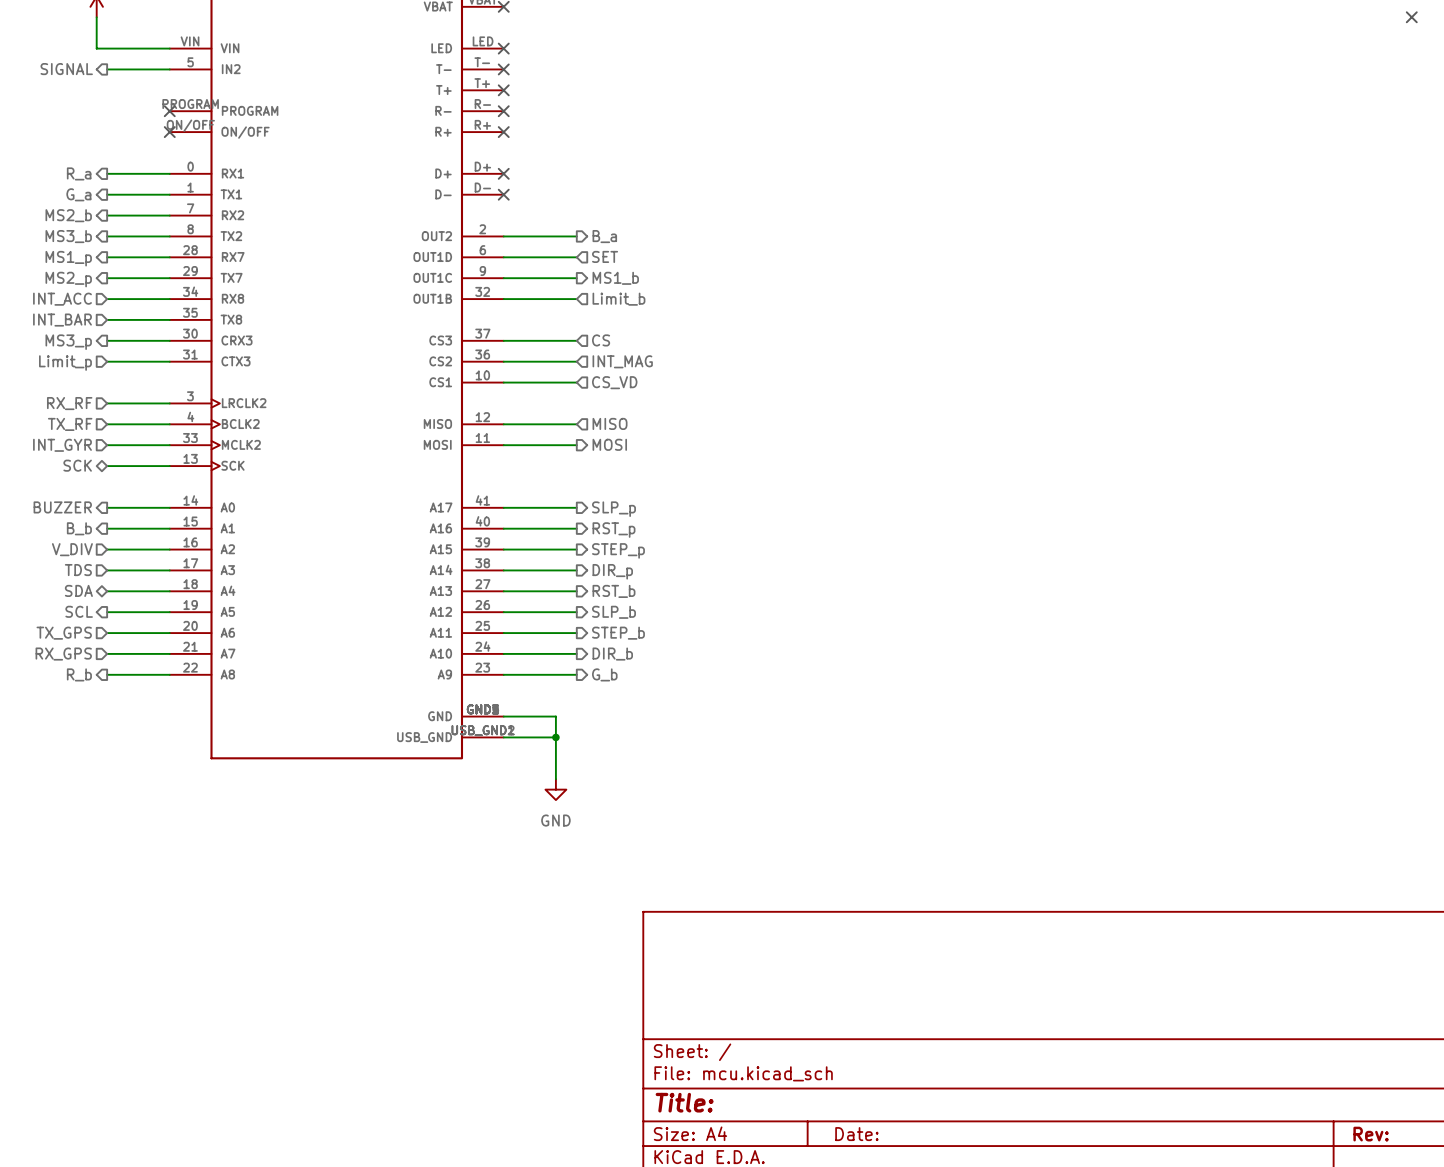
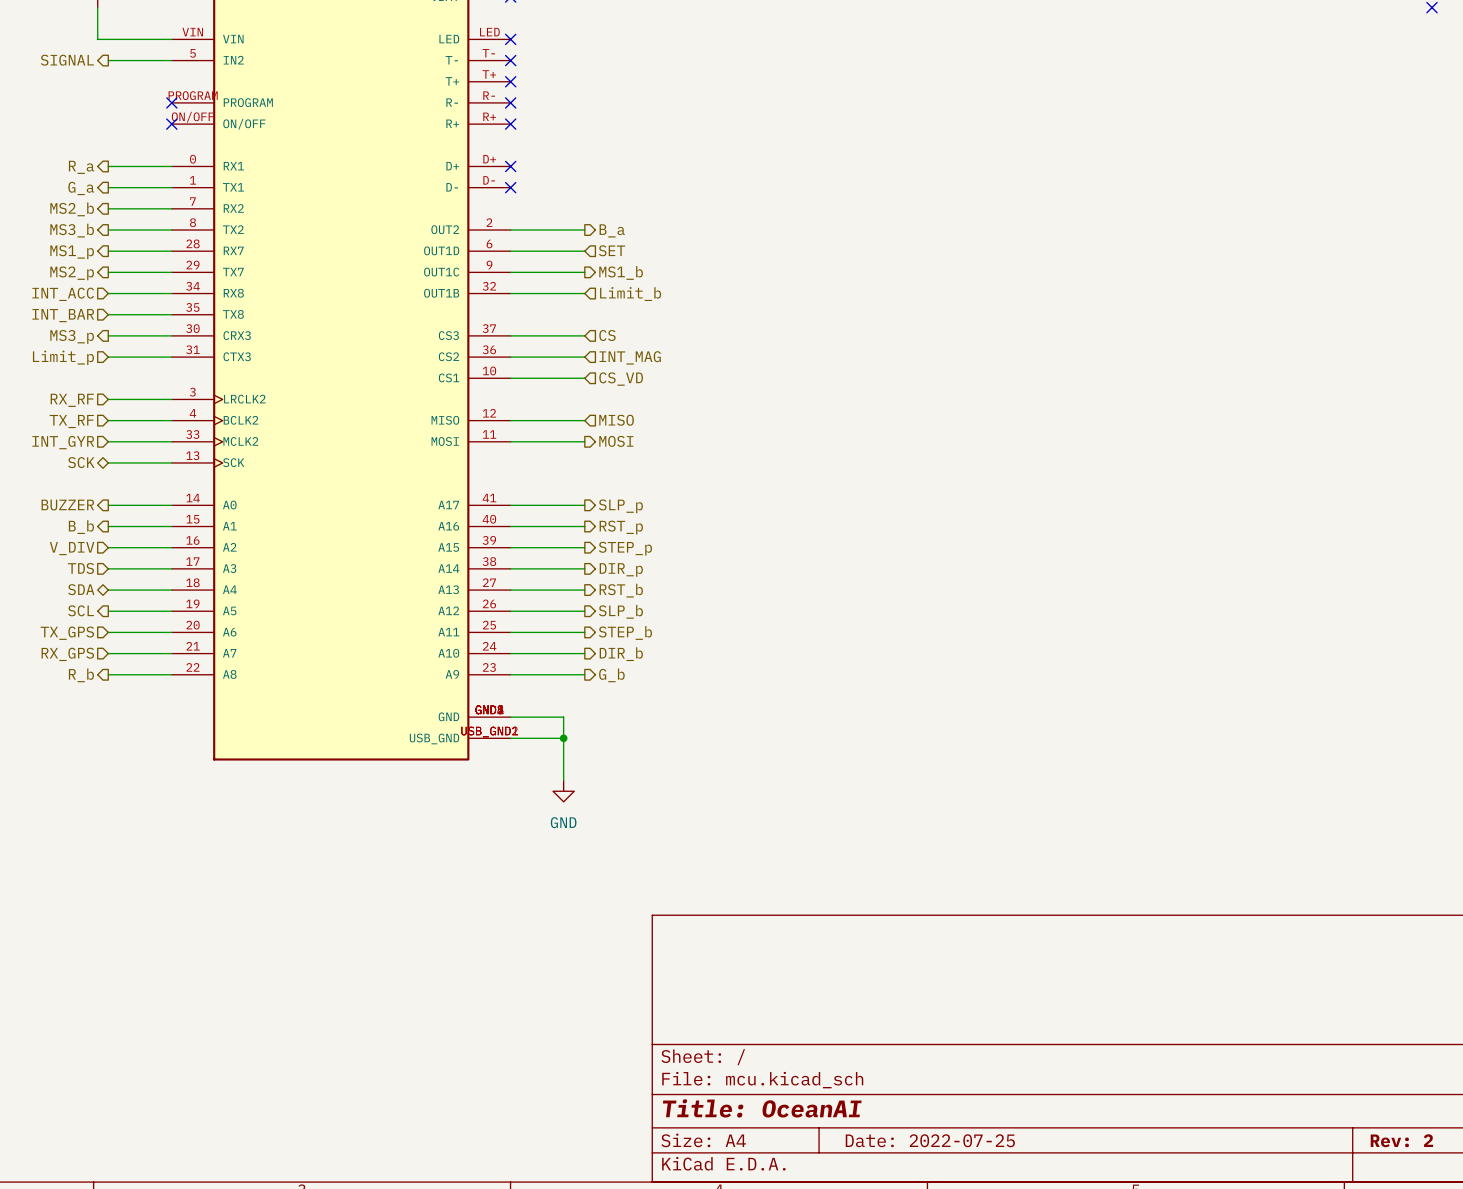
title block: Title: (684, 1102) -> Title: OceanAI (762, 1108)
title block: Date: (856, 1134) -> Date: 2022-07-25 (930, 1140)
title block: Rev: (1371, 1134) -> Rev: 2 (1401, 1140)

